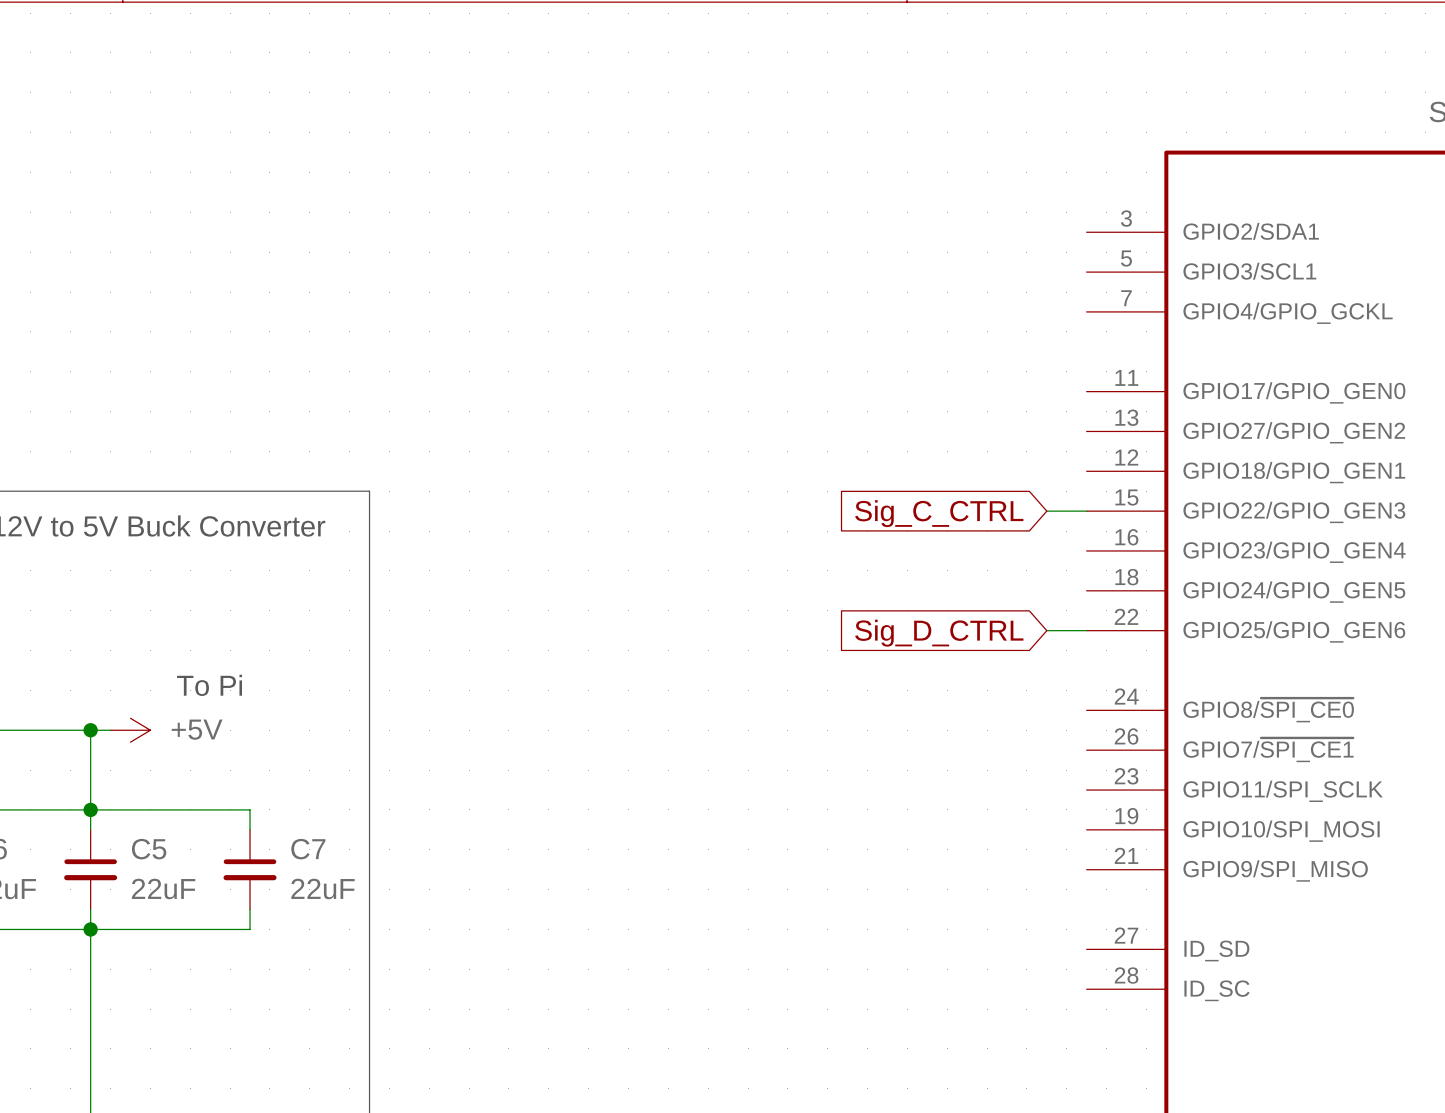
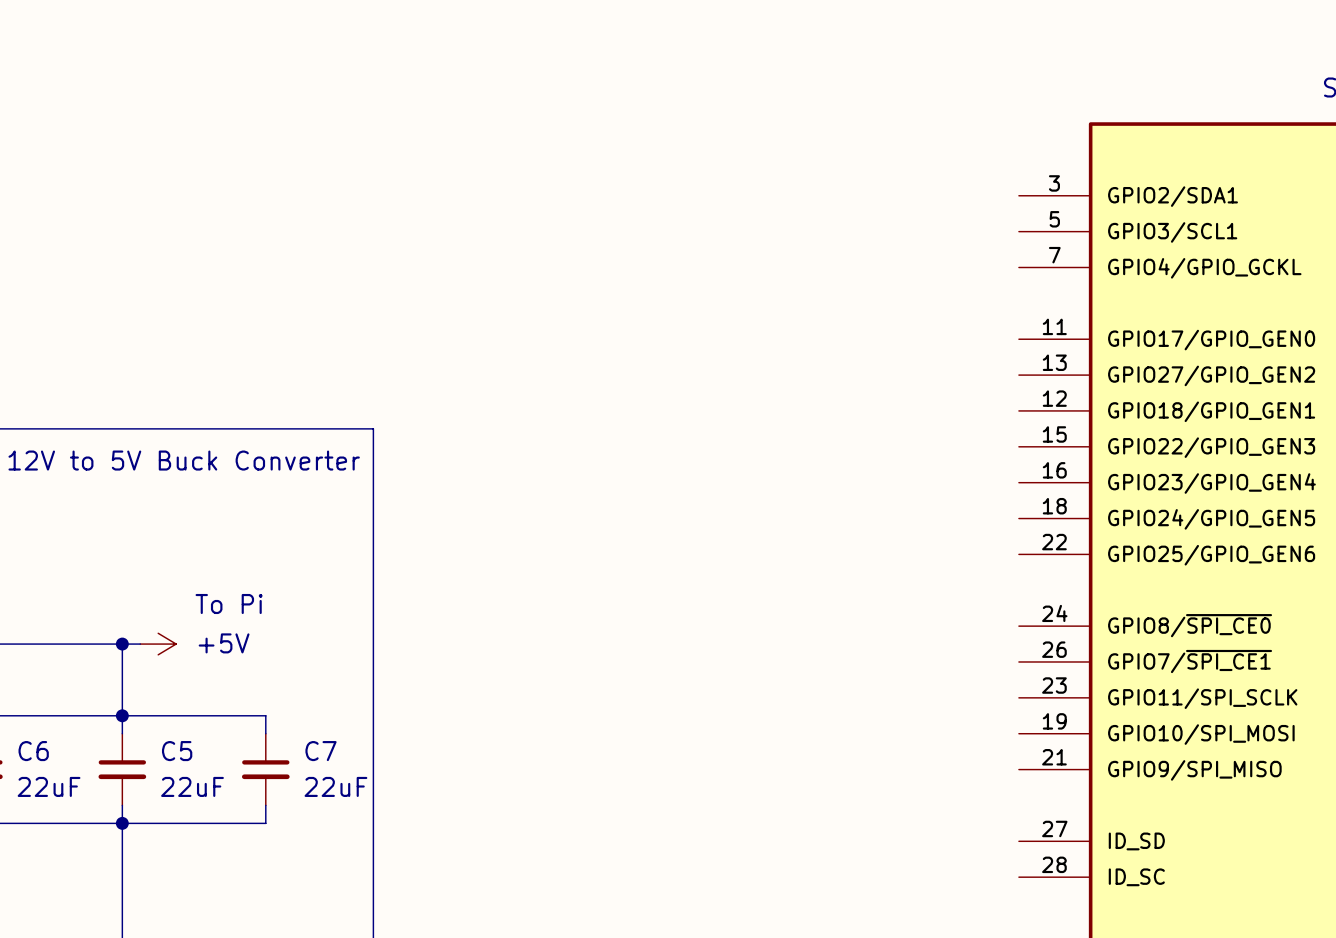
wire: (1046, 511) (1086, 511) -> none
global label: Sig_C_CTRL (939, 513) -> none
wire: (1046, 630) (1086, 630) -> none
global label: Sig_D_CTRL (939, 633) -> none

